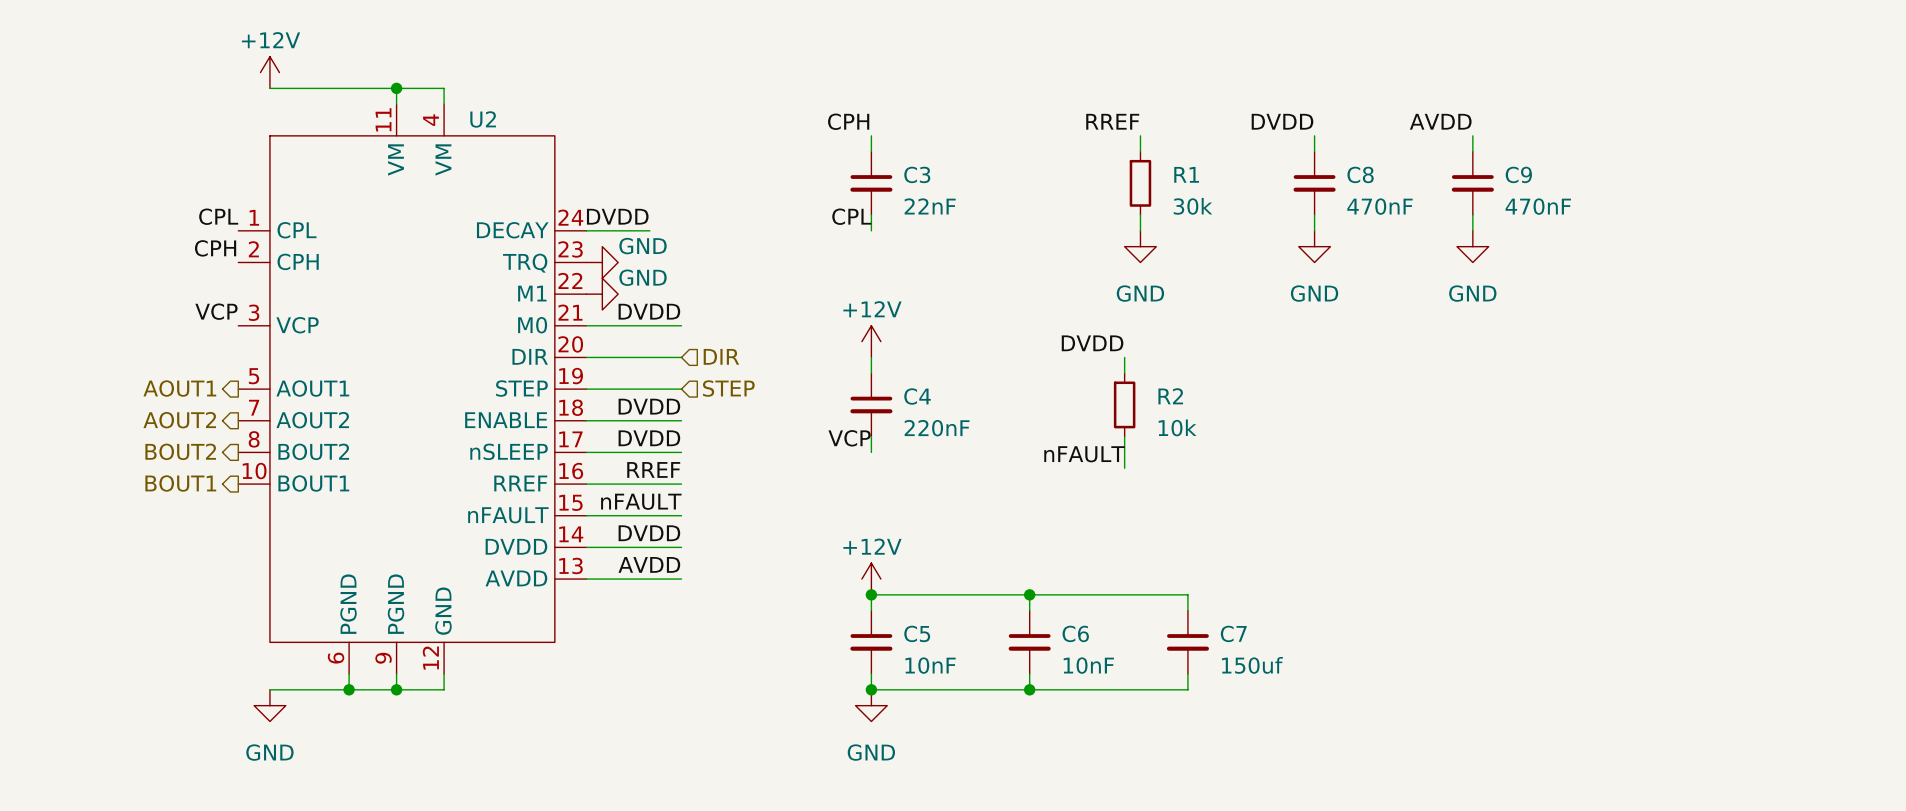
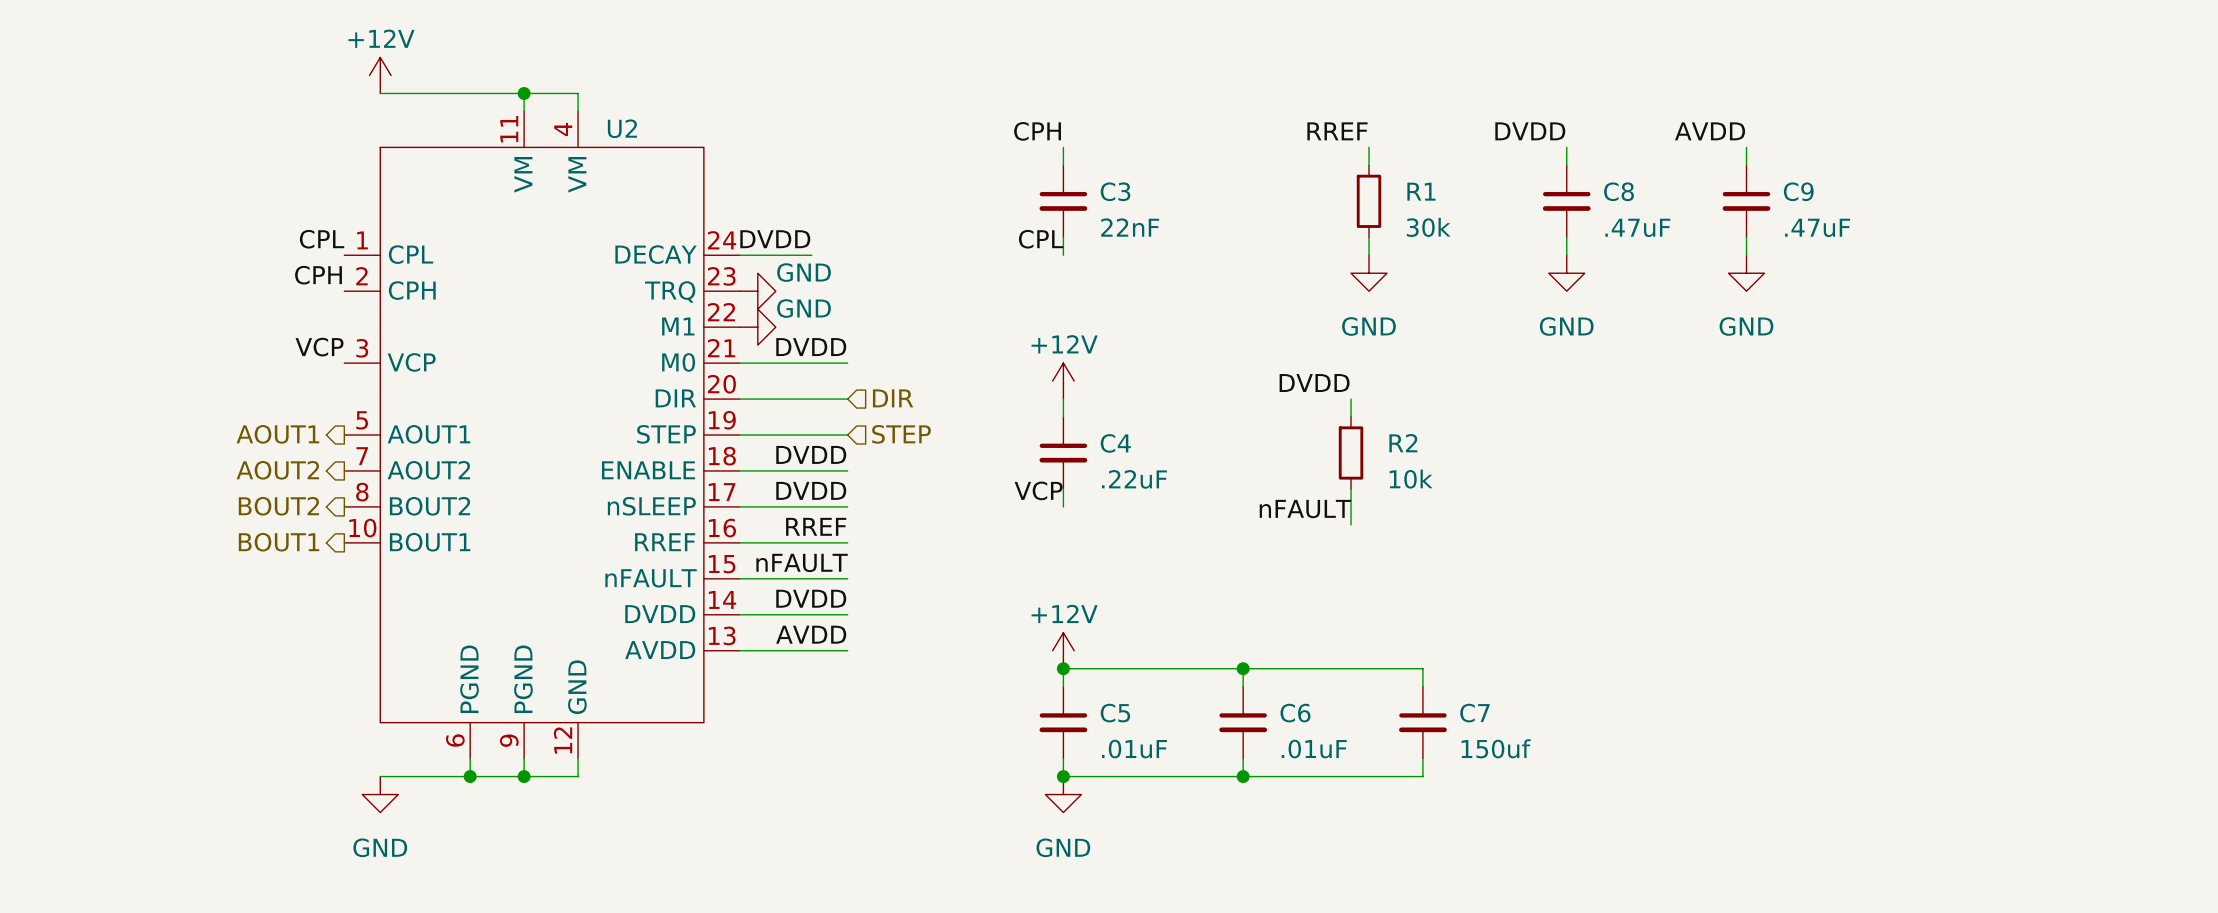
C8 value: 470nF (1379, 206) -> .47uF (1637, 227)
C9 value: 470nF (1538, 206) -> .47uF (1817, 227)
C4 value: 220nF (937, 428) -> .22uF (1134, 479)
C5 value: 10nF (930, 665) -> .01uF (1134, 749)
C6 value: 10nF (1088, 665) -> .01uF (1314, 749)

